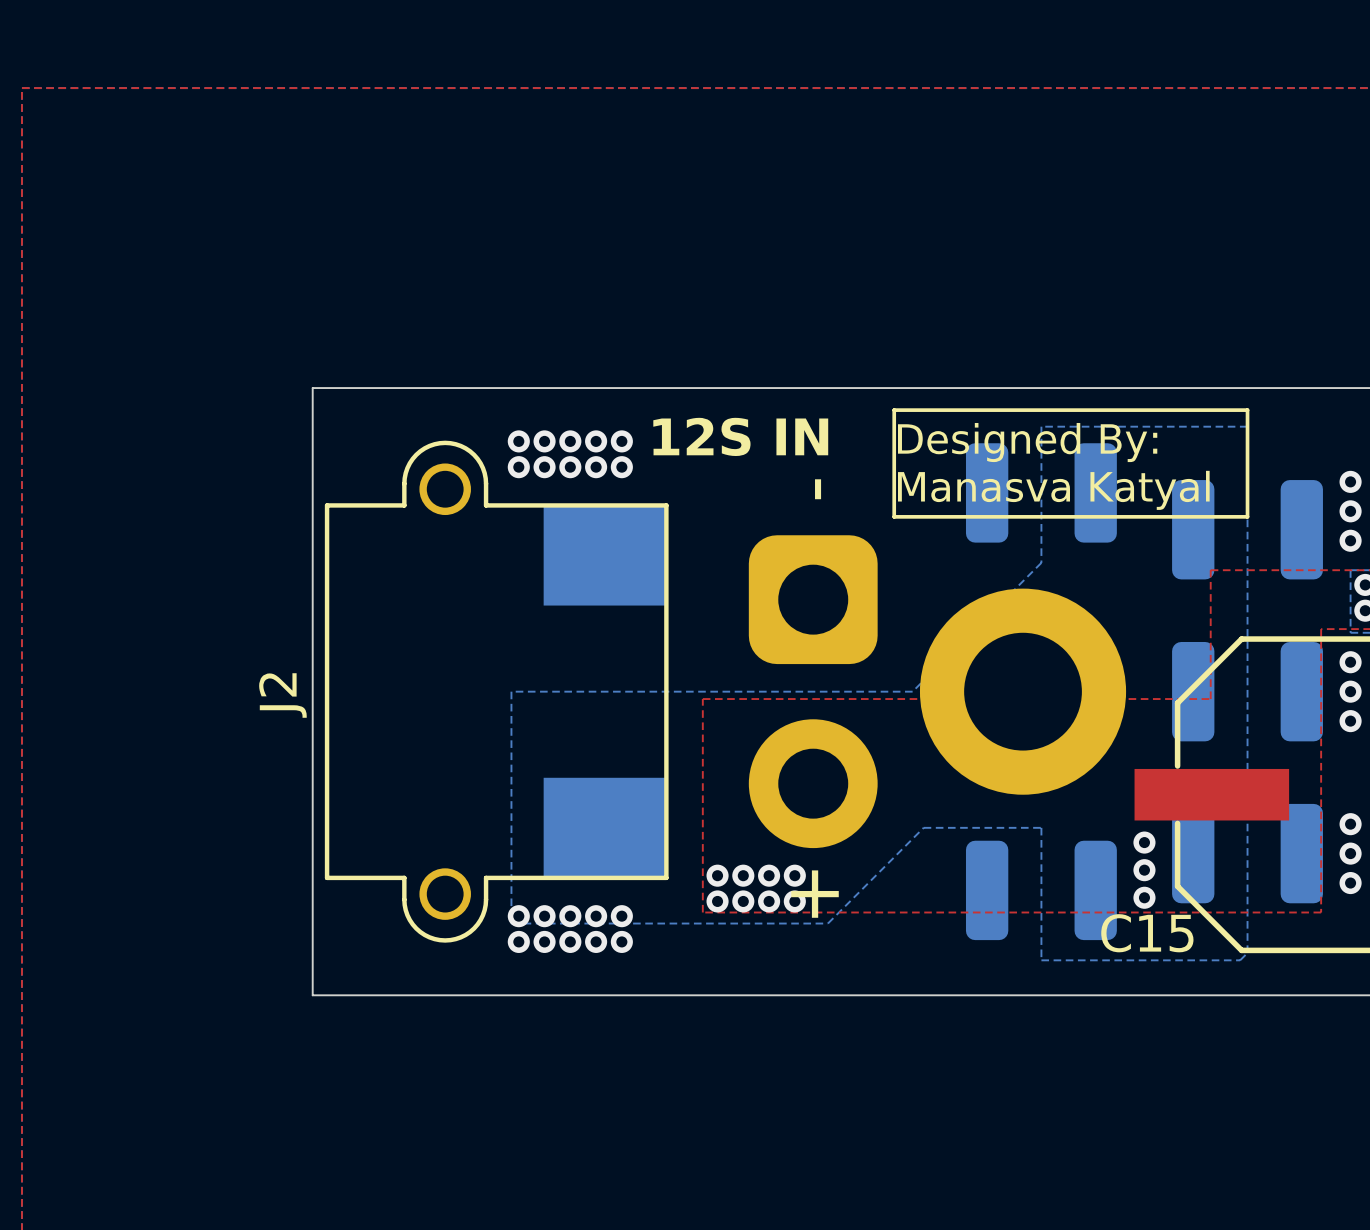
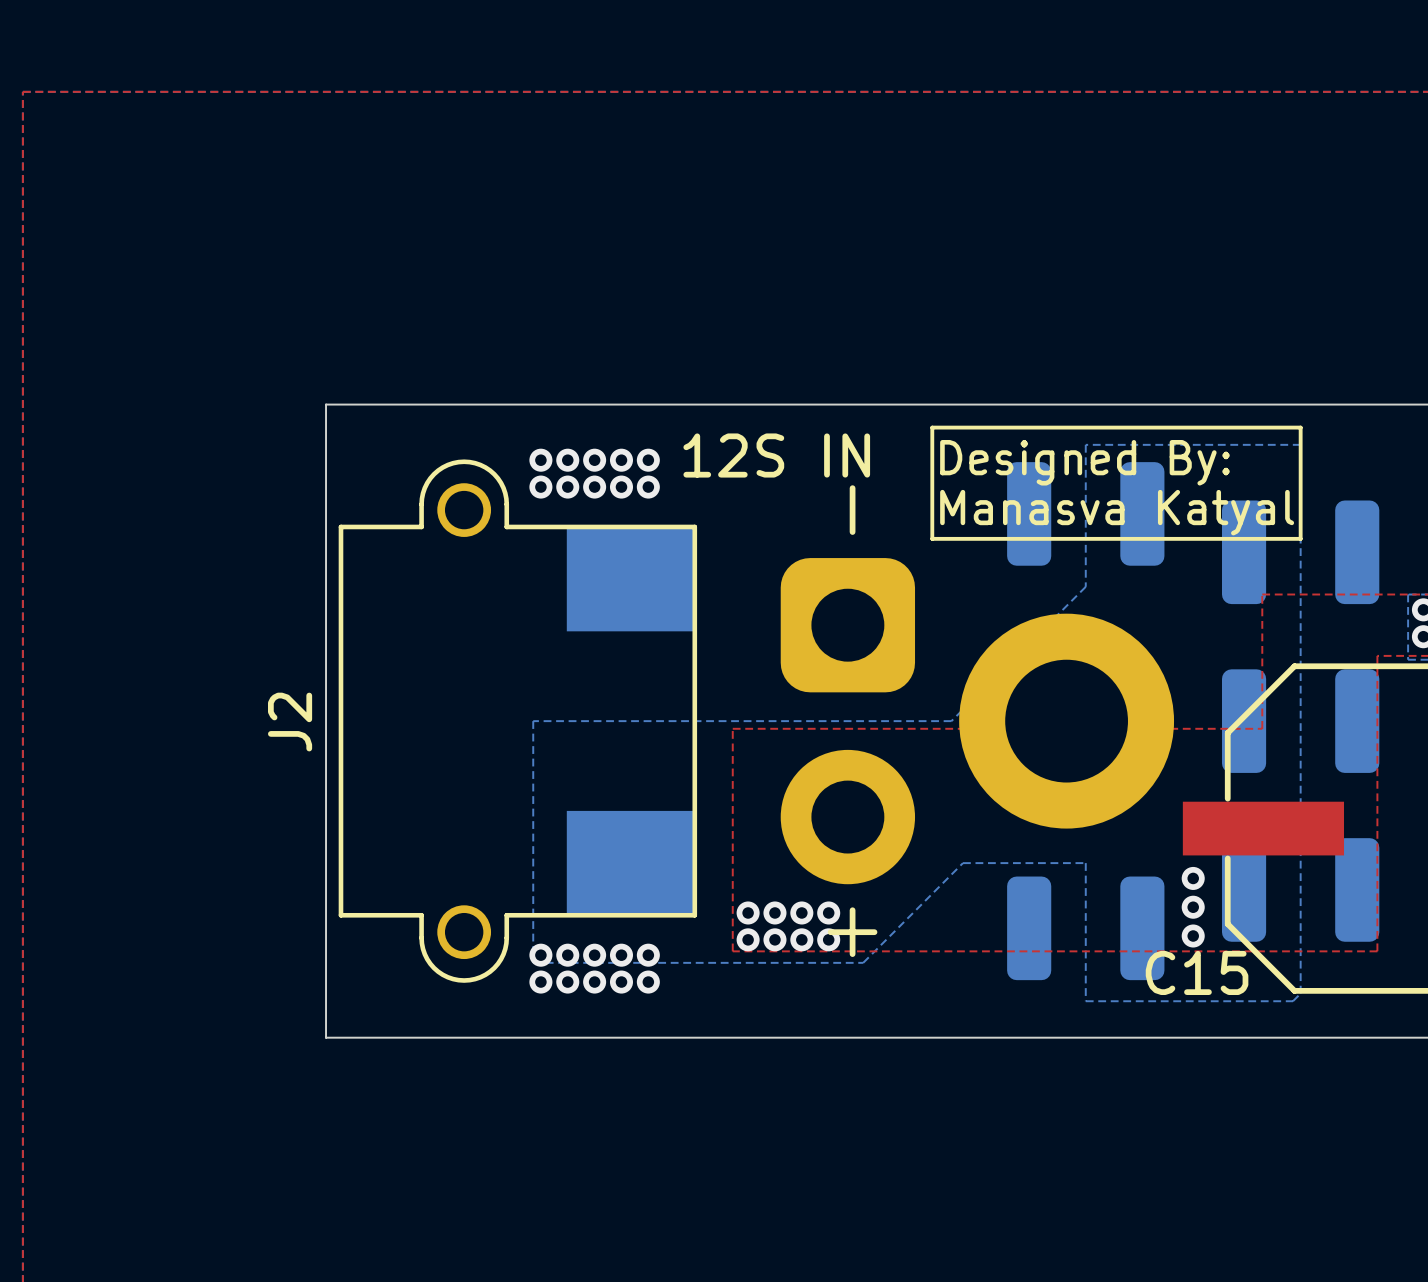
via: (1350, 481) -> none
via: (1350, 511) -> none
via: (1350, 540) -> none
via: (1350, 662) -> none
via: (1350, 691) -> none
via: (1350, 721) -> none
via: (1350, 824) -> none
via: (1350, 853) -> none
via: (1350, 883) -> none

